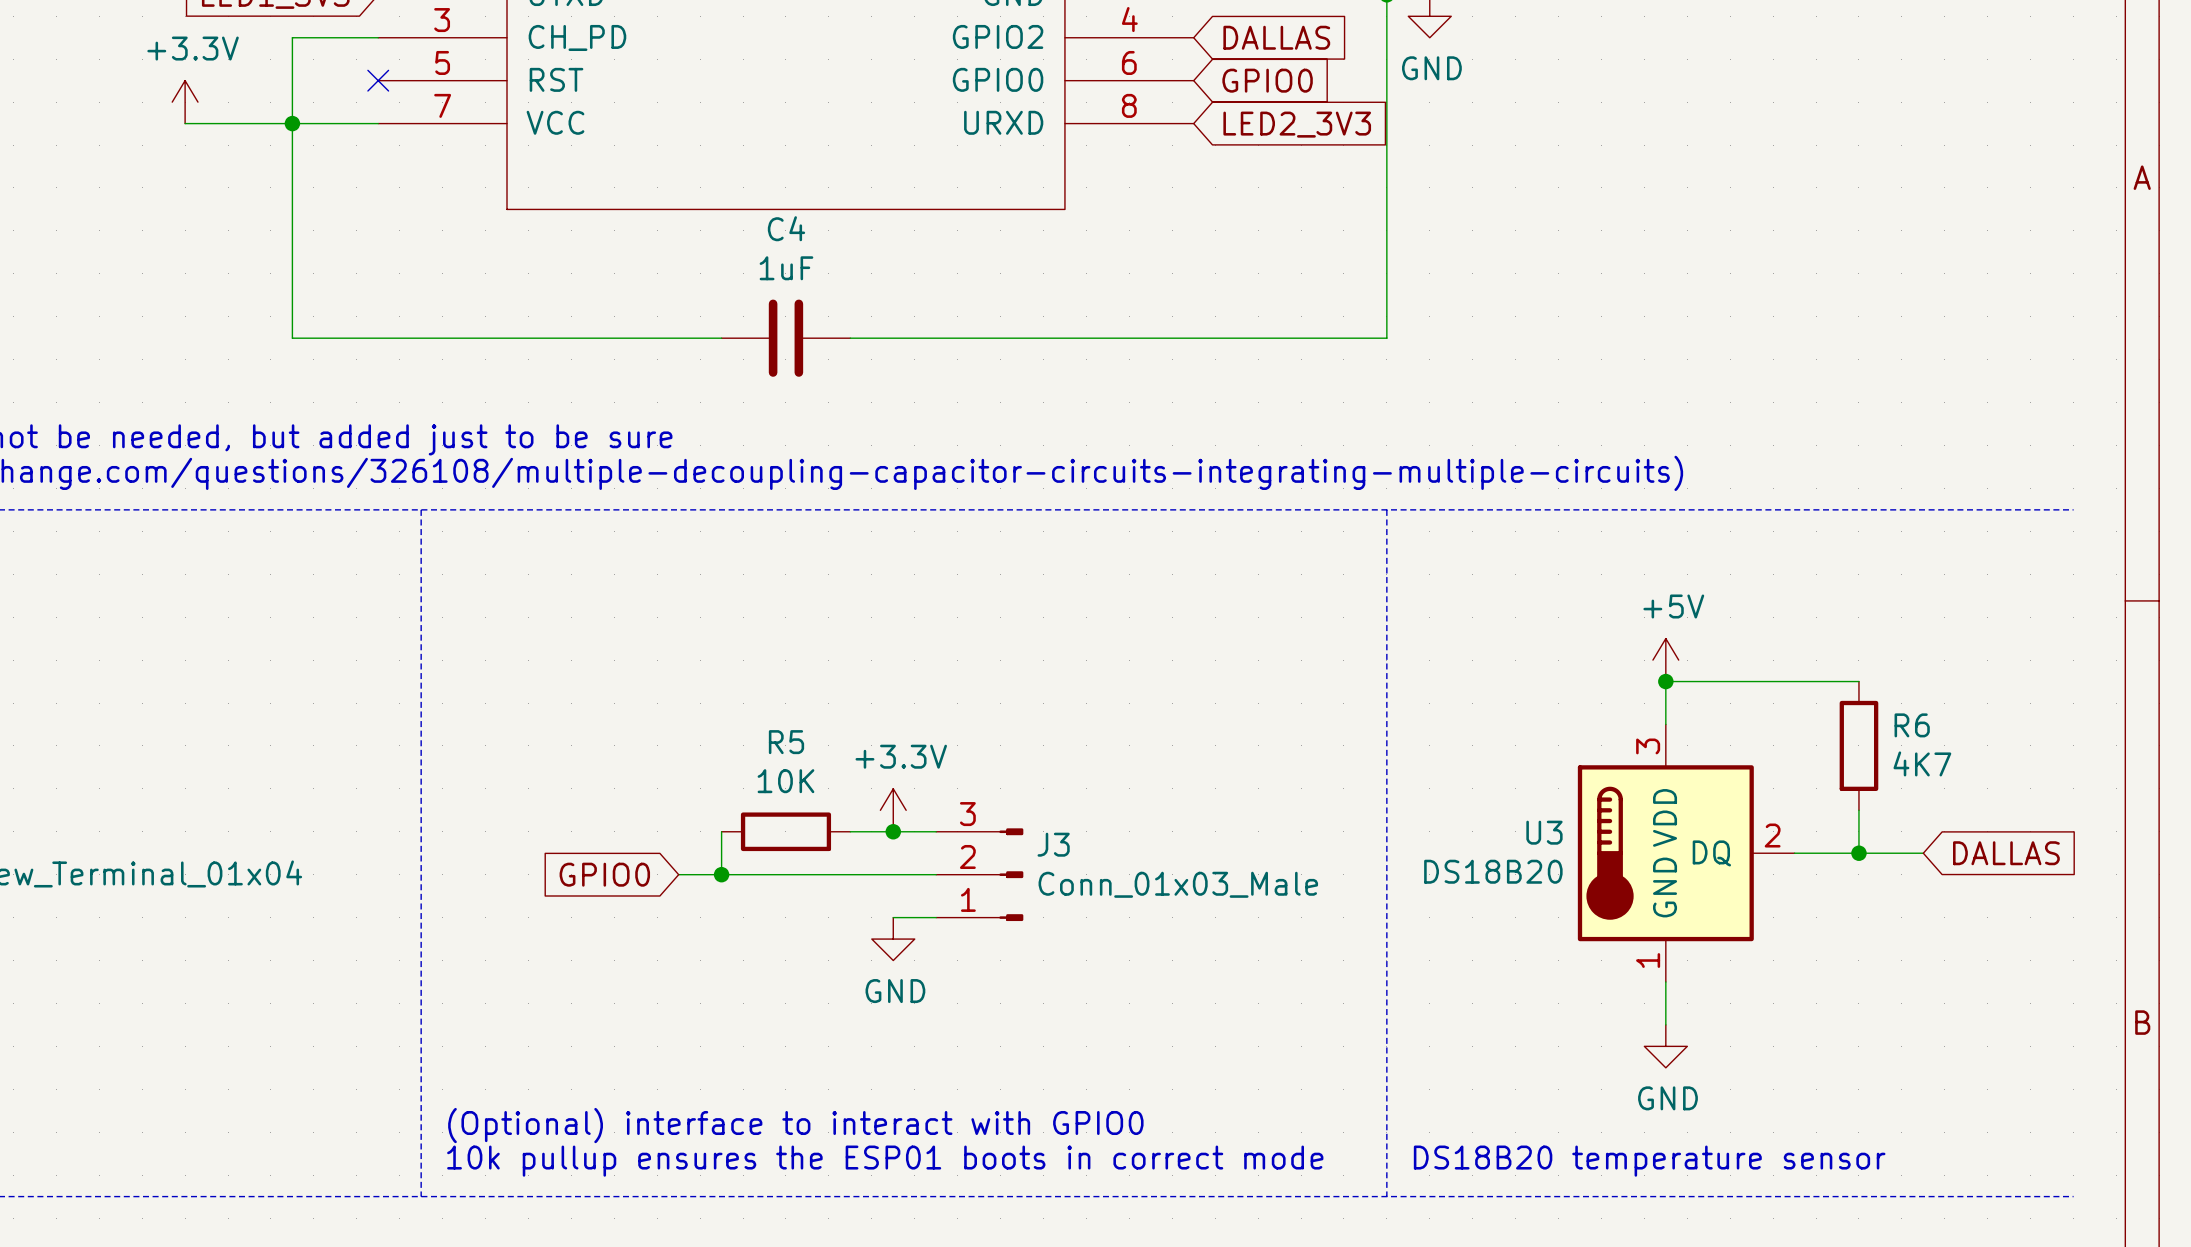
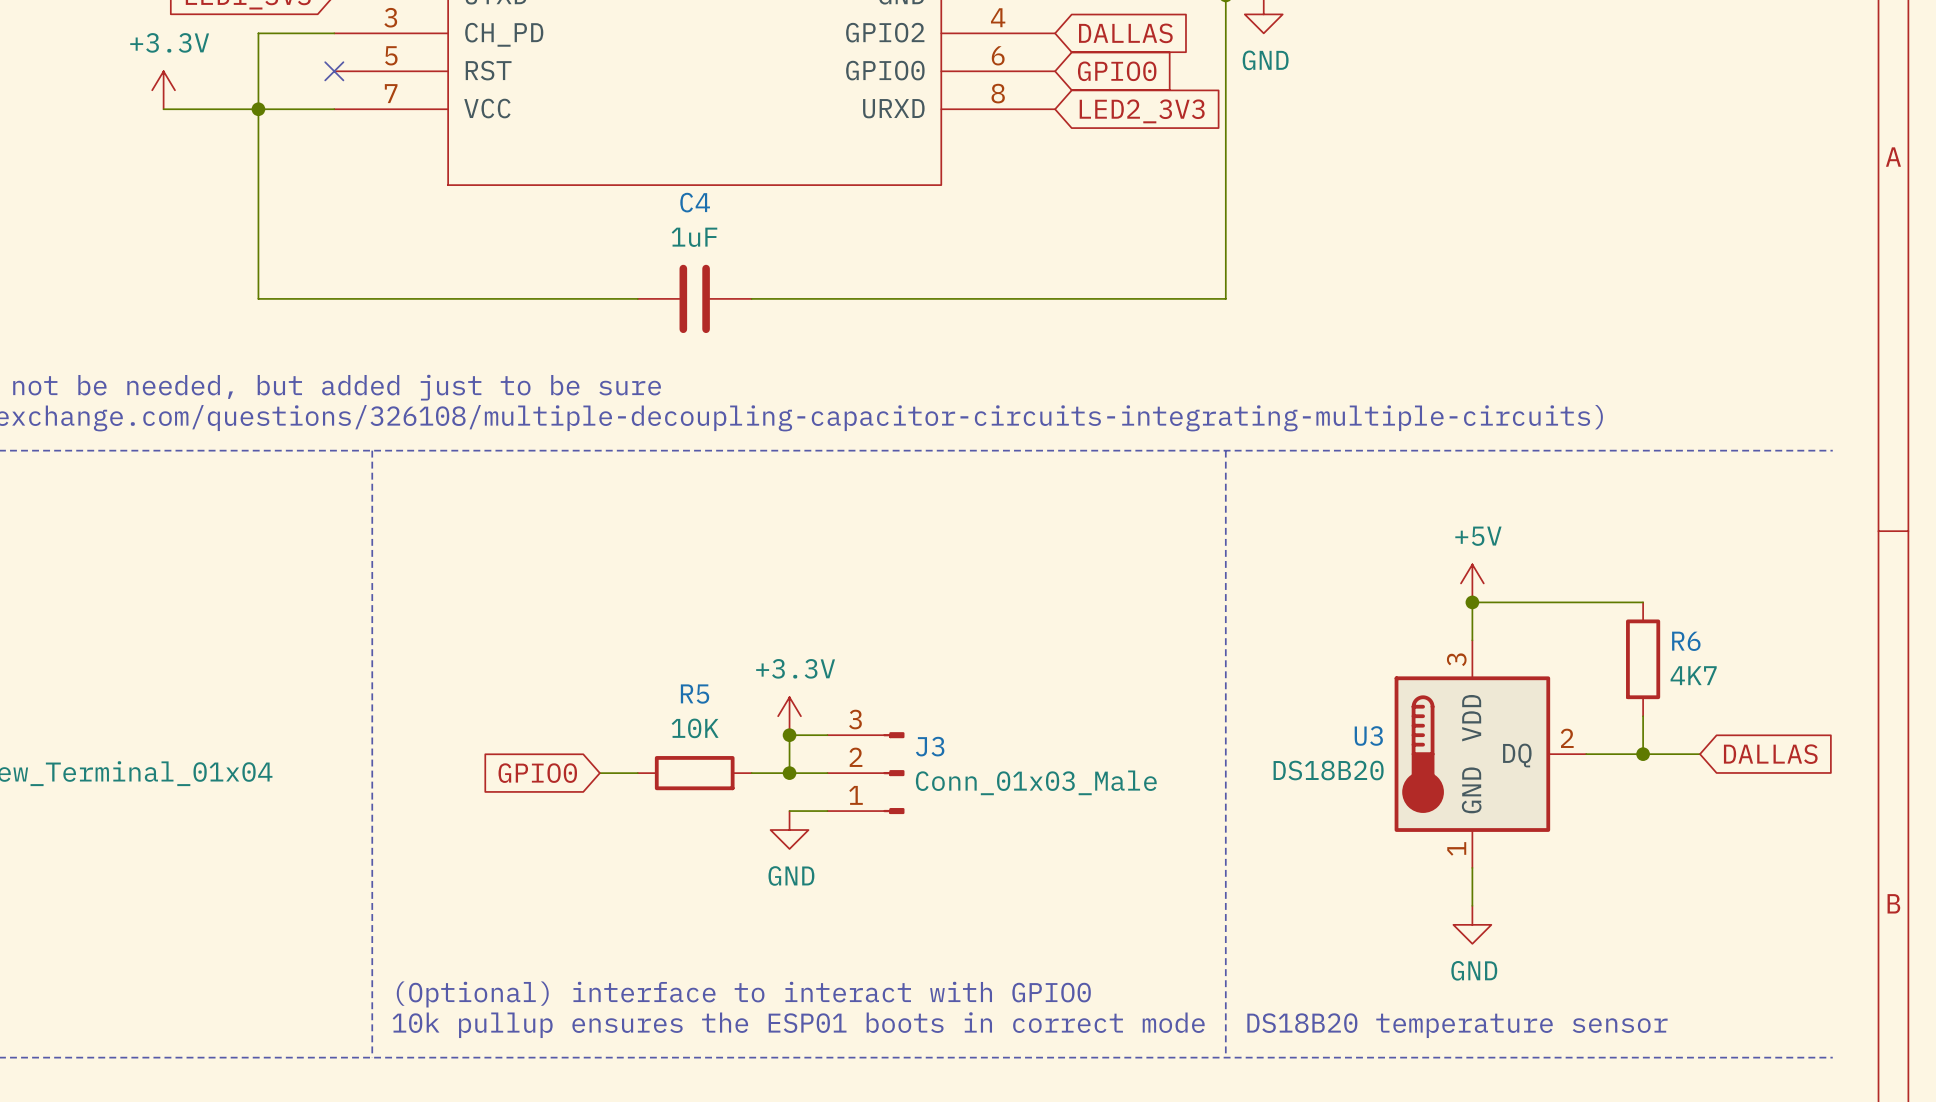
wire: (721, 831) (721, 874) (850, 874) -> none
R5 position: (785, 831) -> (694, 773)
wire: (850, 831) (893, 831) -> (789, 773) (789, 735)
junction: (721, 874) -> none
junction: none -> (789, 773)

